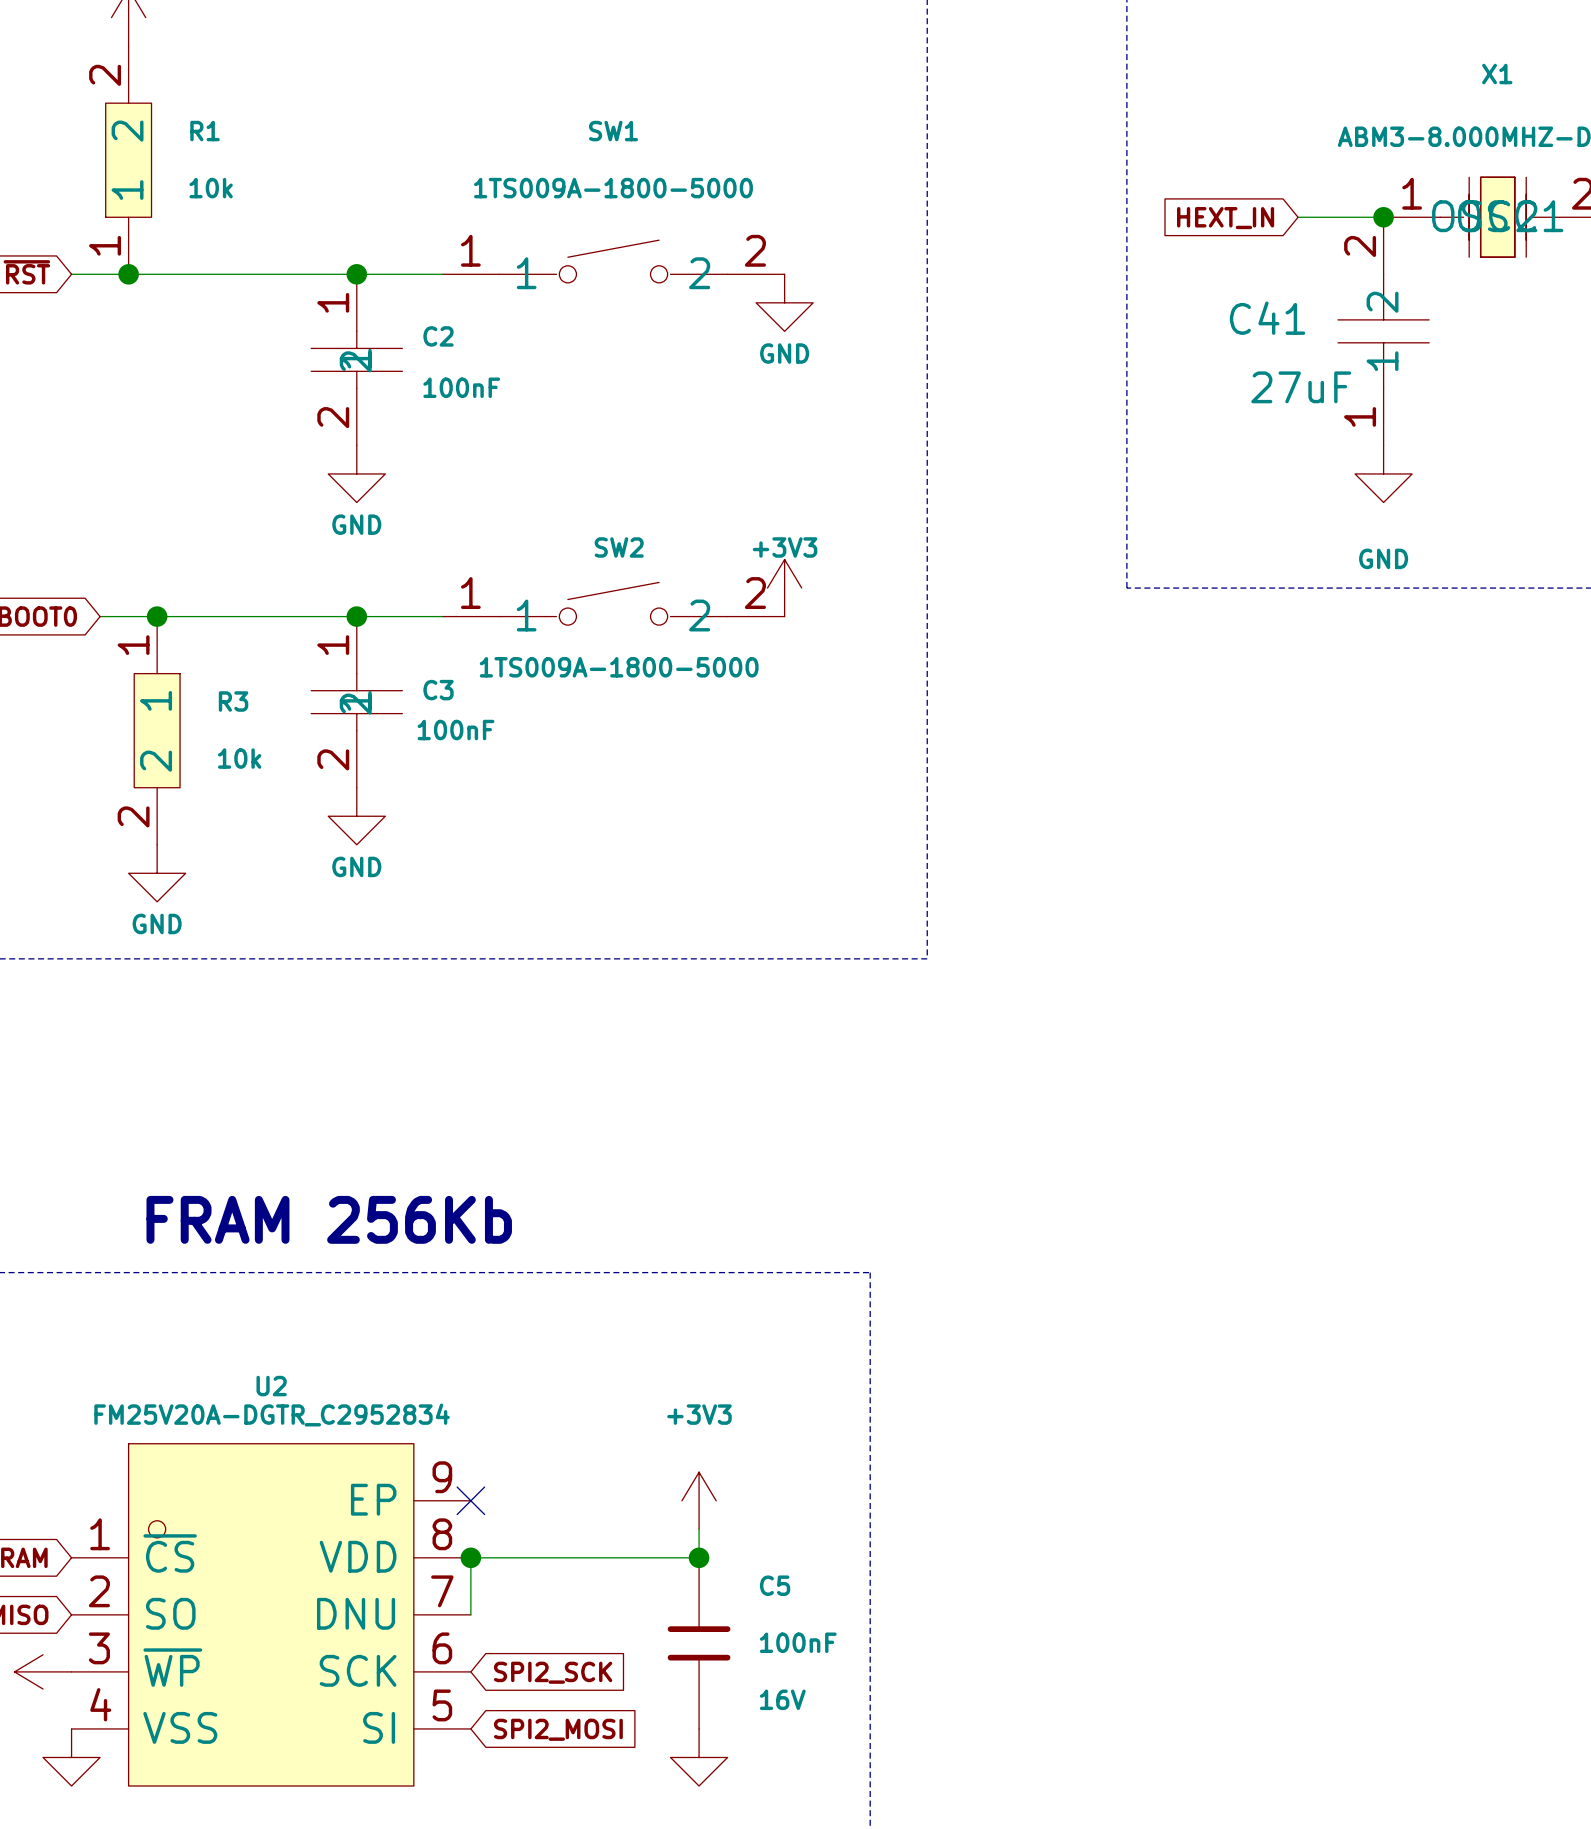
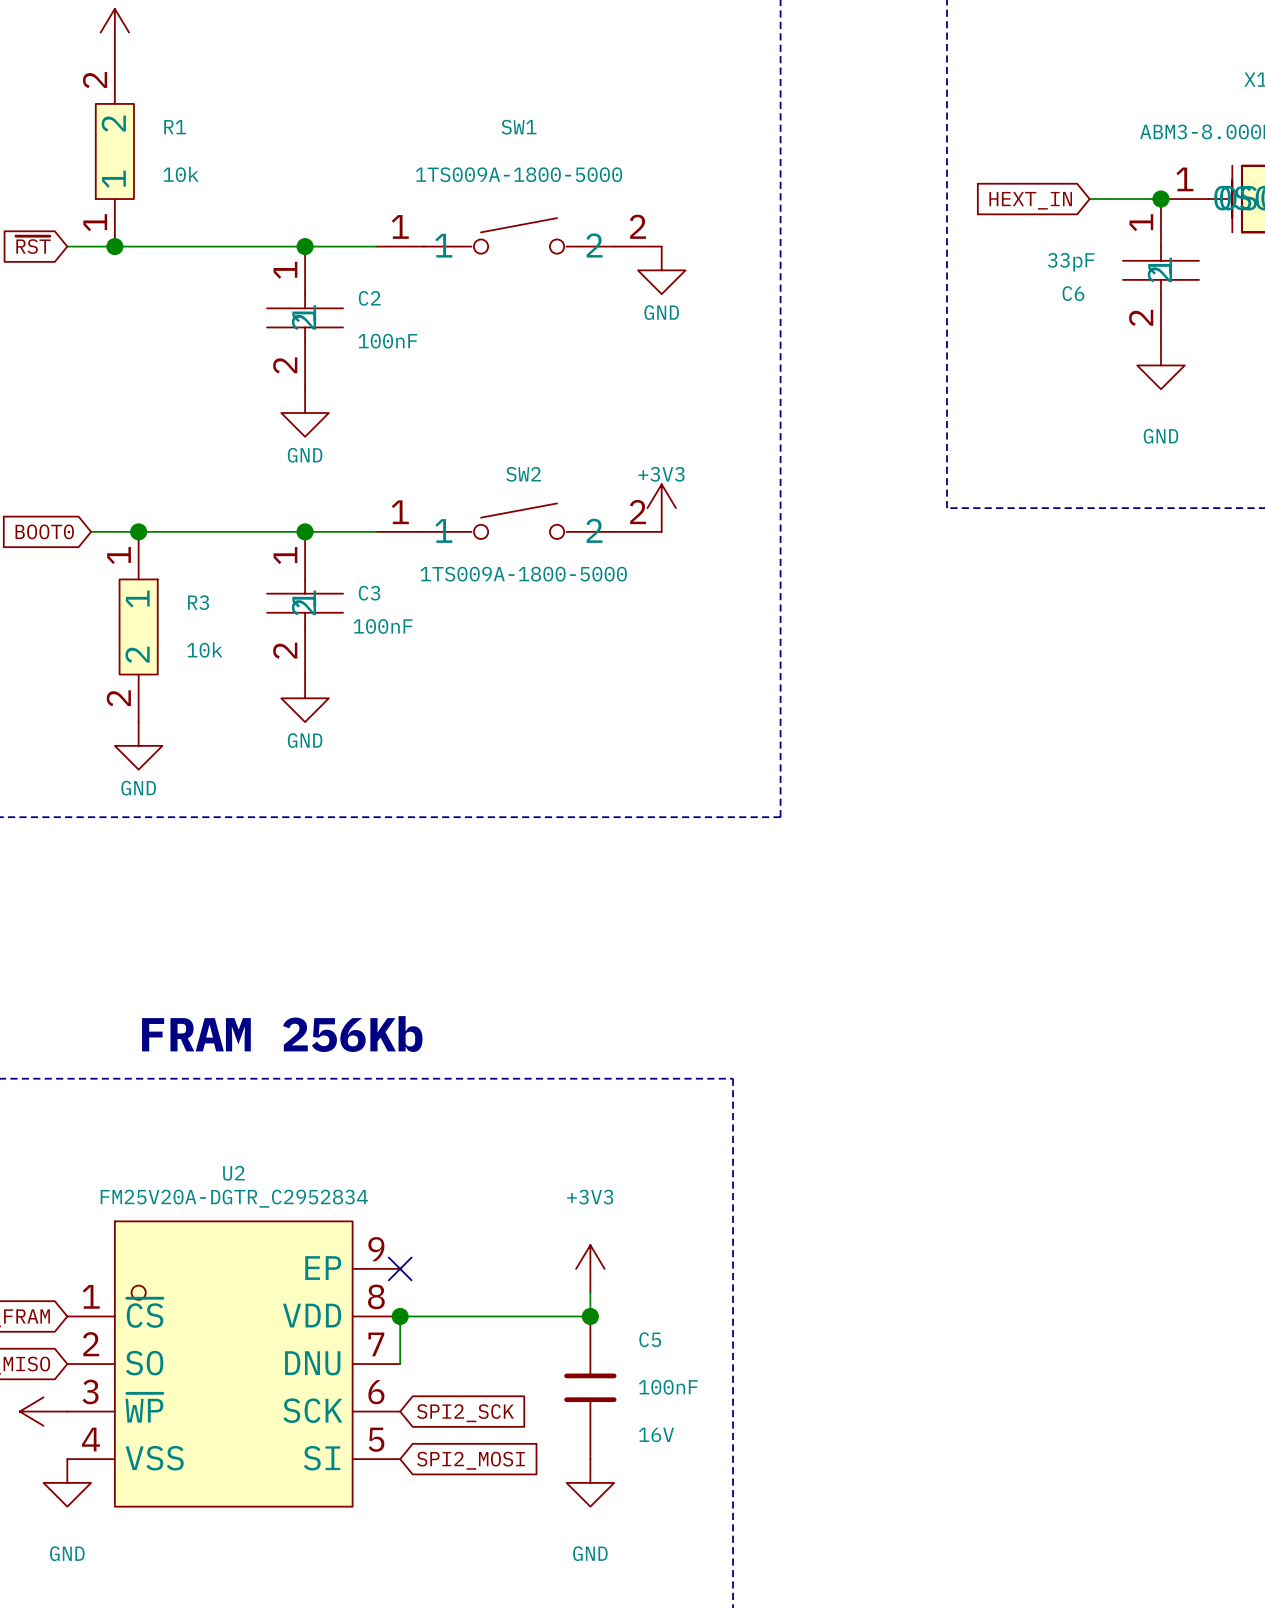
C6: none -> 33pF (1160, 270)
C41: 27uF (1383, 331) -> none
power symbol position: GND (1383, 473) -> GND (1160, 365)

